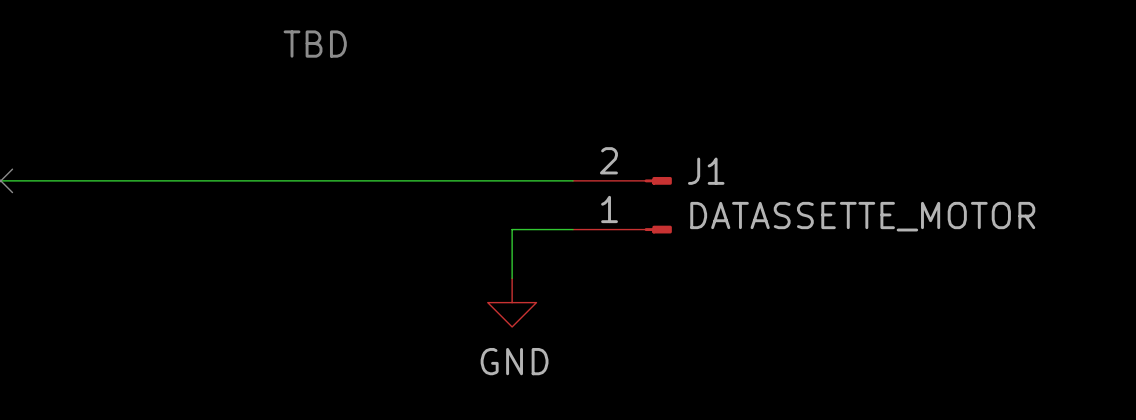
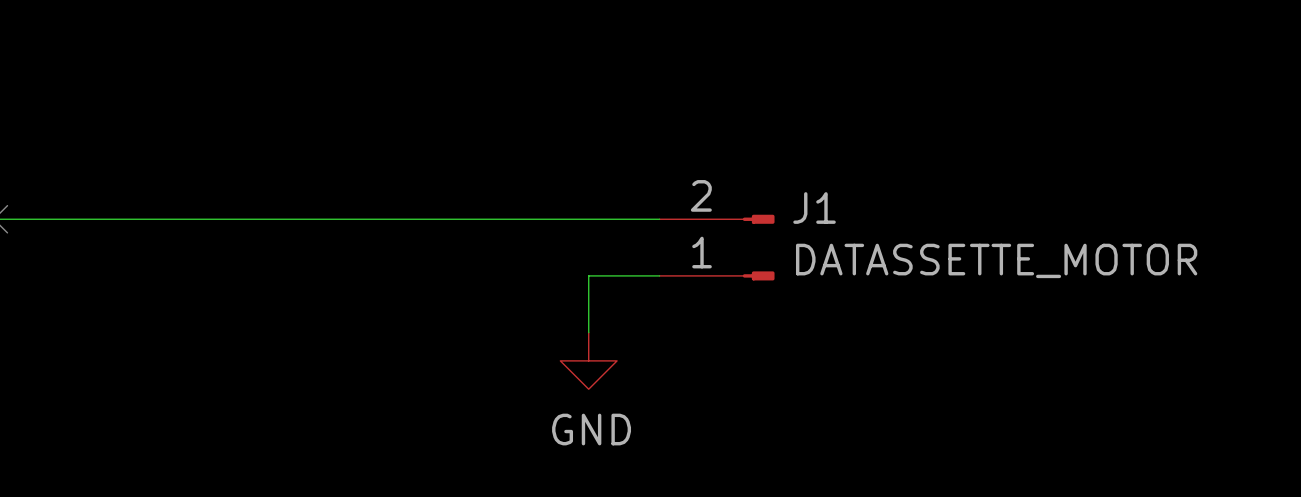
text: TBD (315, 44) -> none

